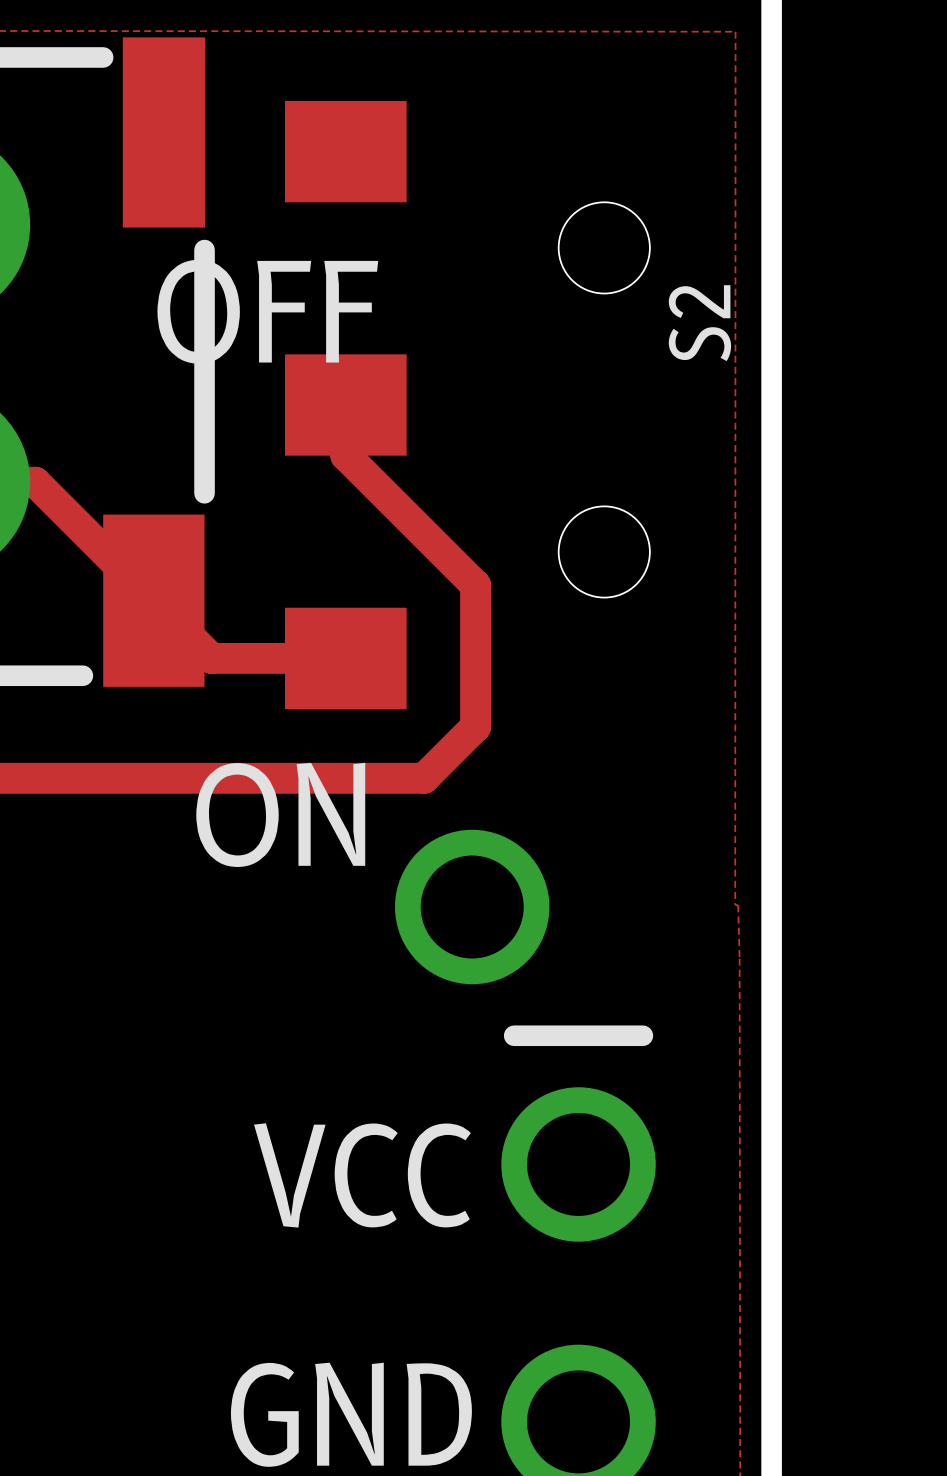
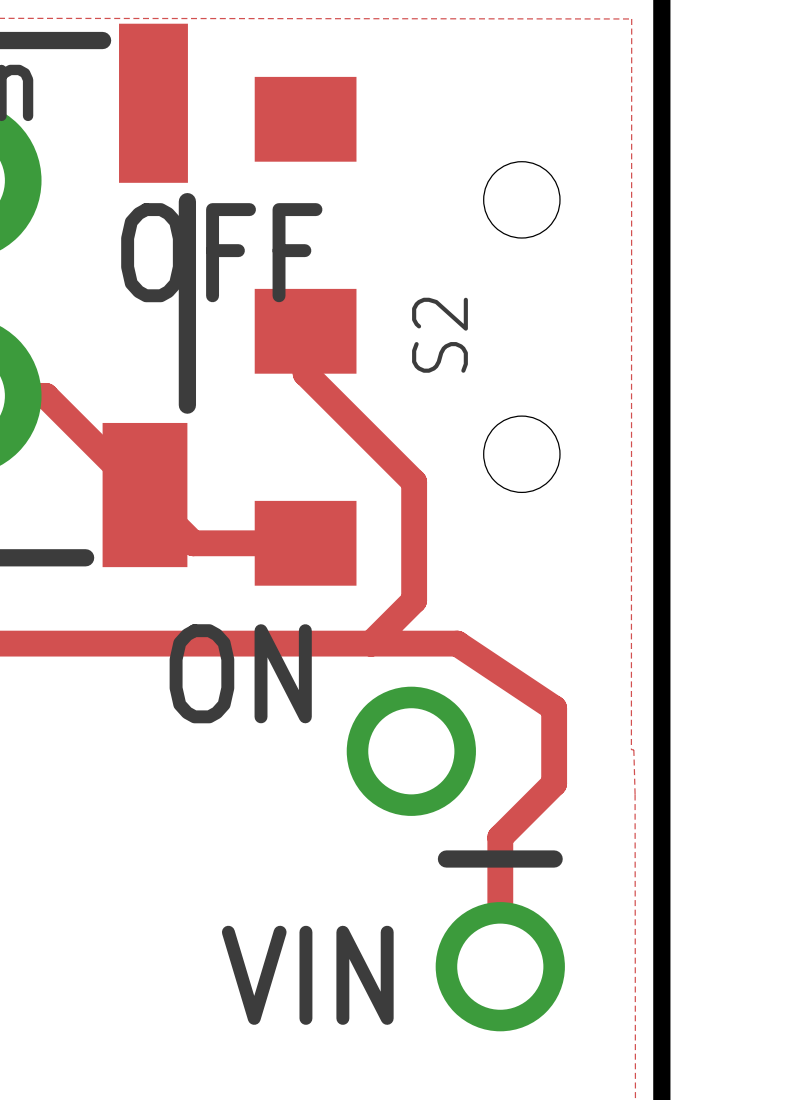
S2 name position: S2 (699, 323) -> S2 (439, 335)
track: none -> (371, 643) (457, 643) (554, 708) (554, 783) (500, 837) (500, 966)
text: VCC (362, 1175) -> VIN (307, 975)

